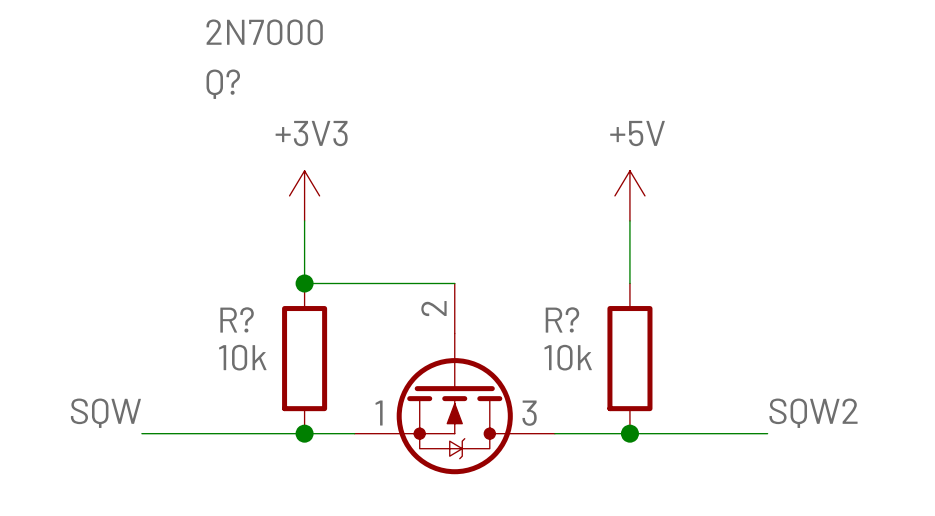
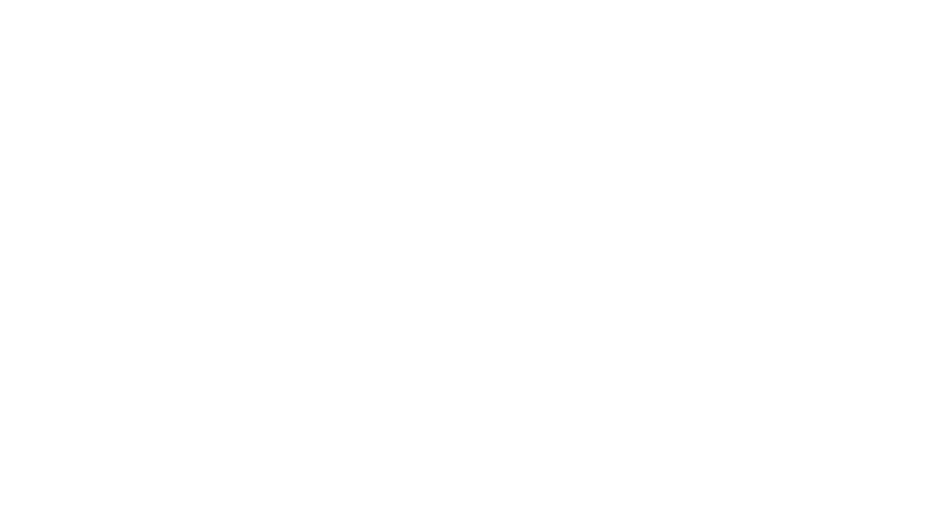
power symbol: +3V3 (304, 195) -> none
power symbol: +5V (629, 195) -> none
wire: (304, 220) (304, 283) (454, 283) -> none
wire: (629, 220) (629, 283) -> none
junction: (304, 283) -> none
R?: 10k (304, 358) -> none
R?: 10k (629, 358) -> none
Q?: 2N7000 (454, 378) -> none
label: SQW (105, 413) -> none
label: SQW2 (813, 413) -> none
wire: (141, 433) (354, 433) -> none
junction: (304, 433) -> none
wire: (554, 433) (767, 433) -> none
junction: (629, 433) -> none

